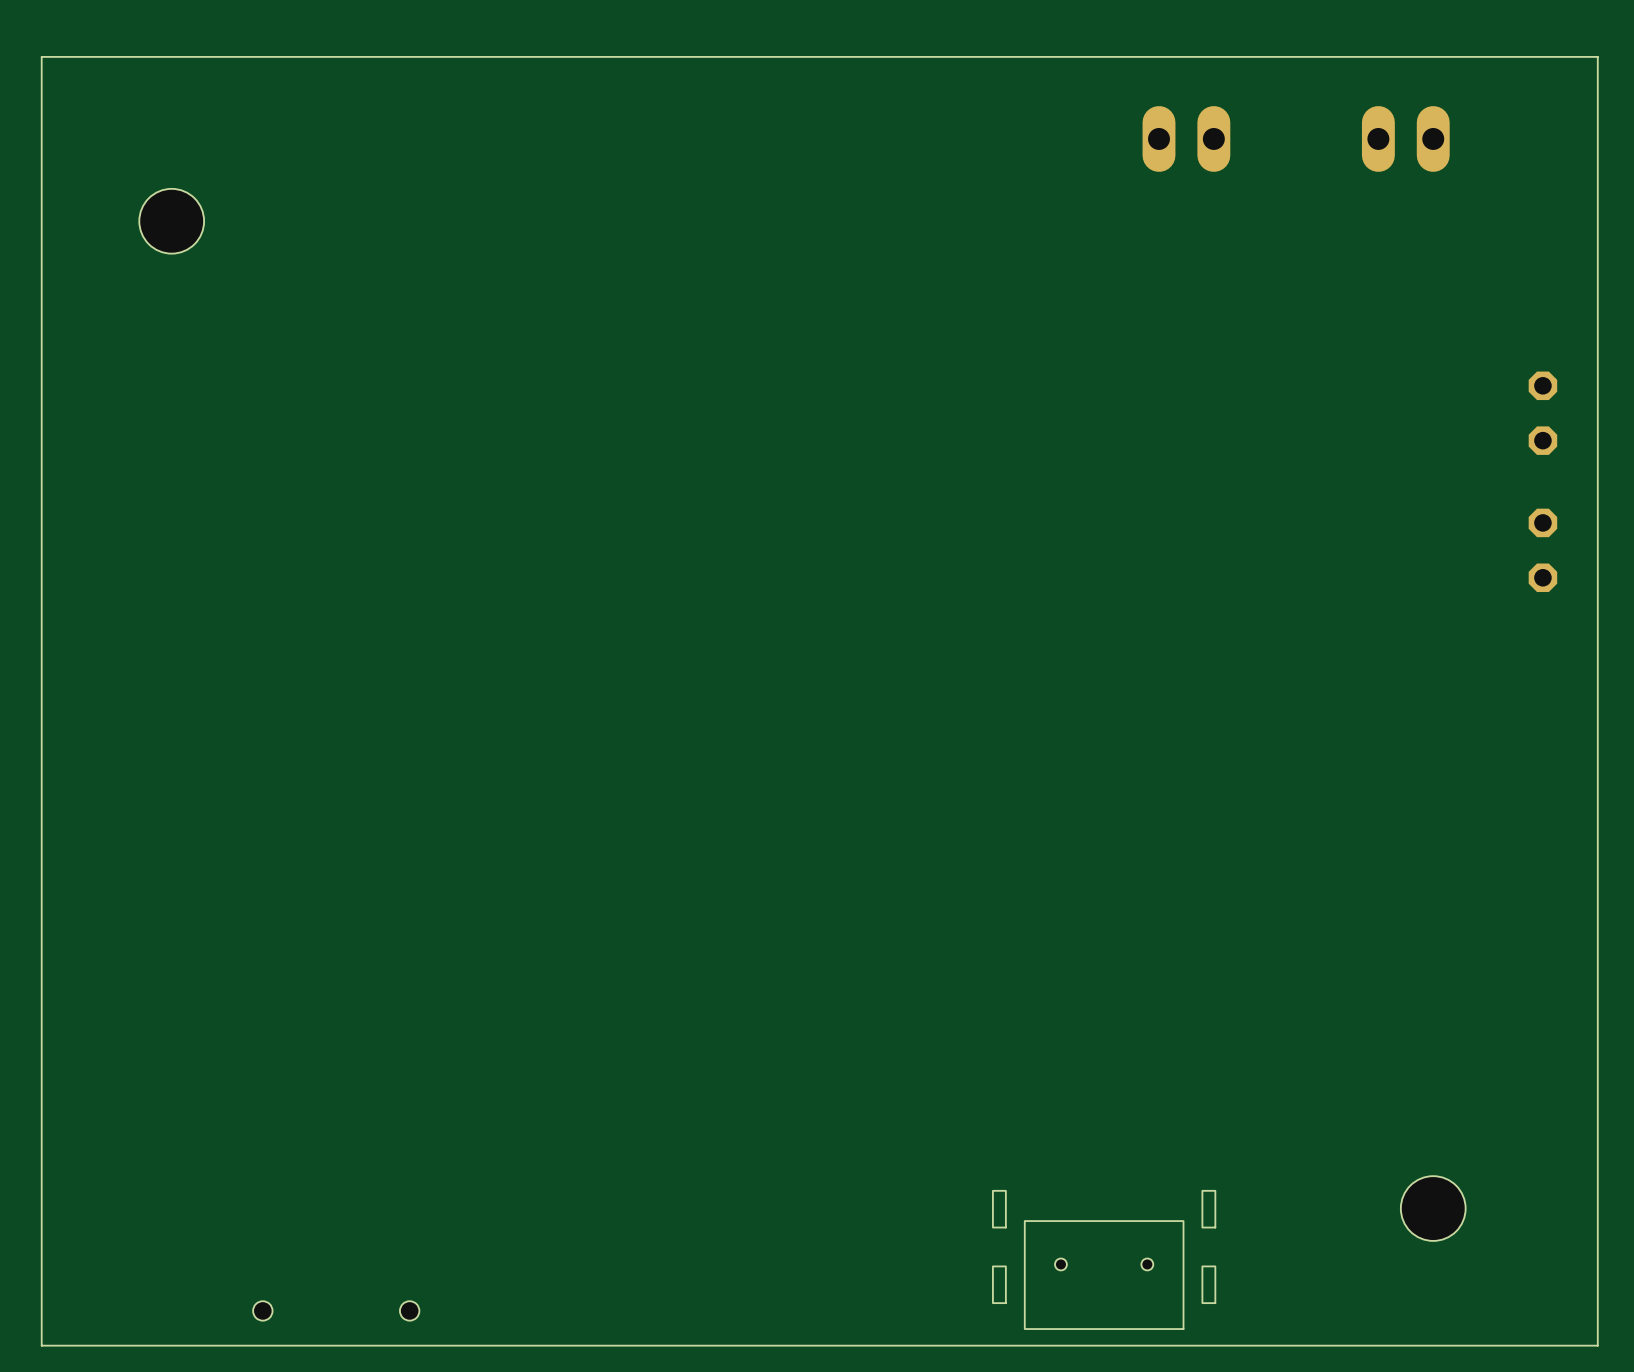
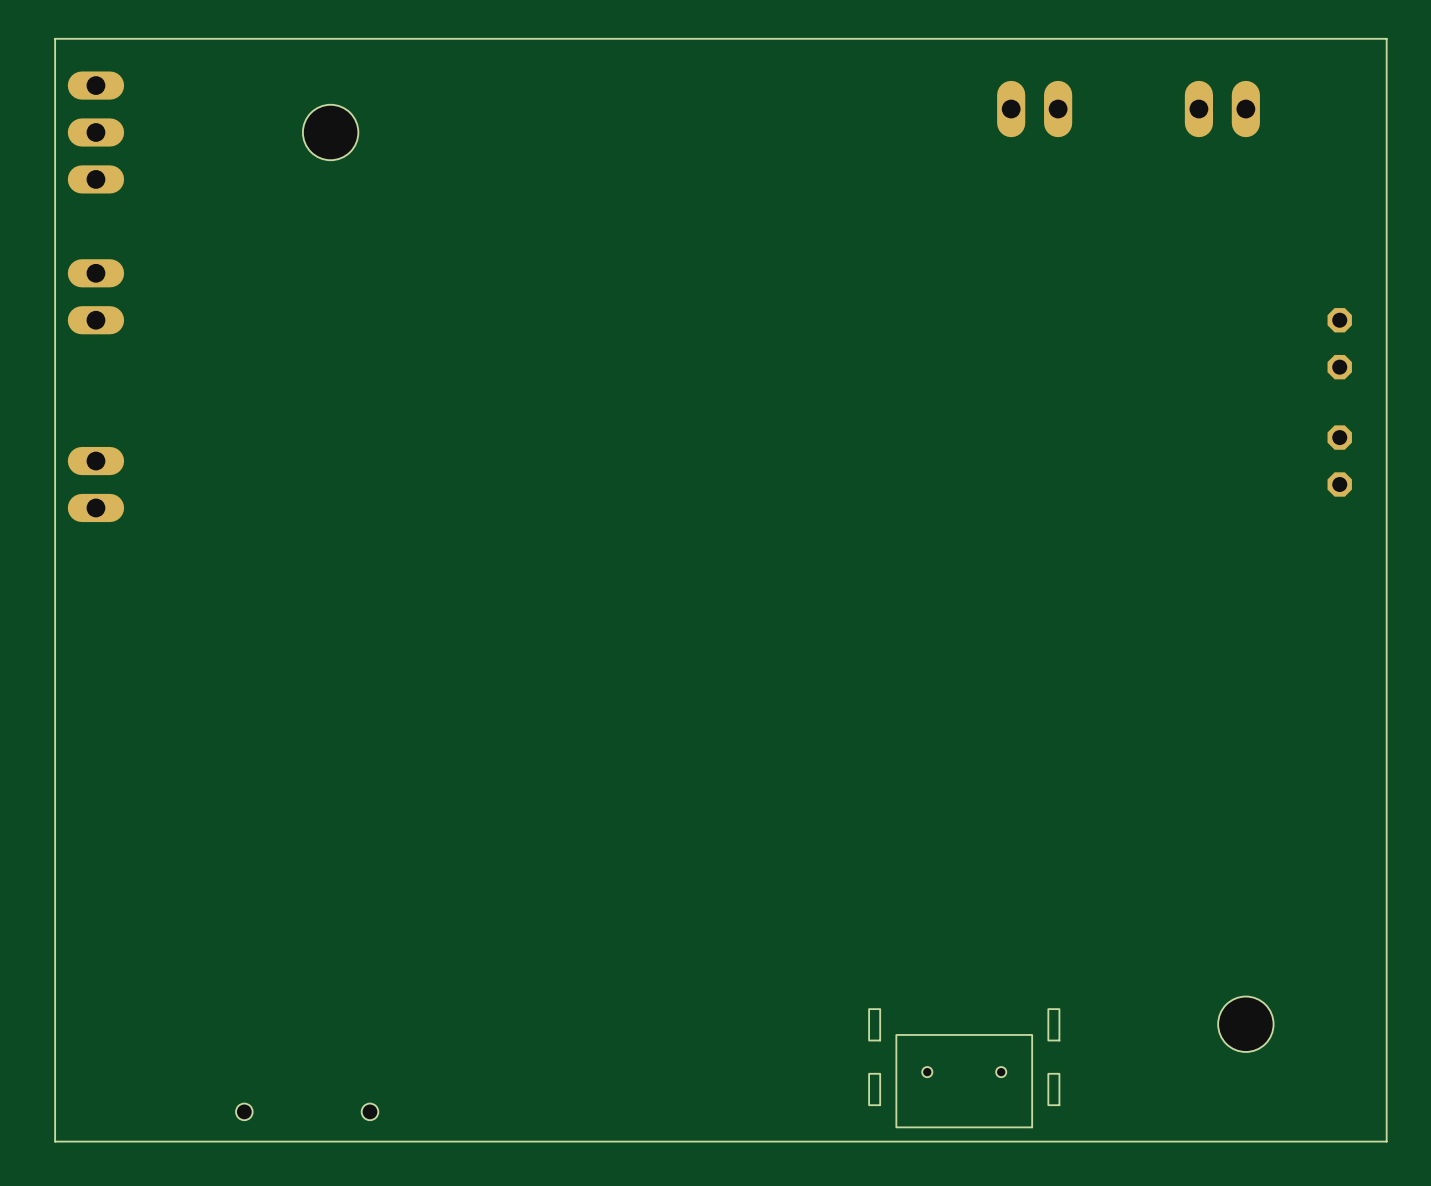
part: none -> (95, 132)
part position: (171, 221) -> (330, 132)
part: none -> (95, 296)
part: none -> (95, 484)

